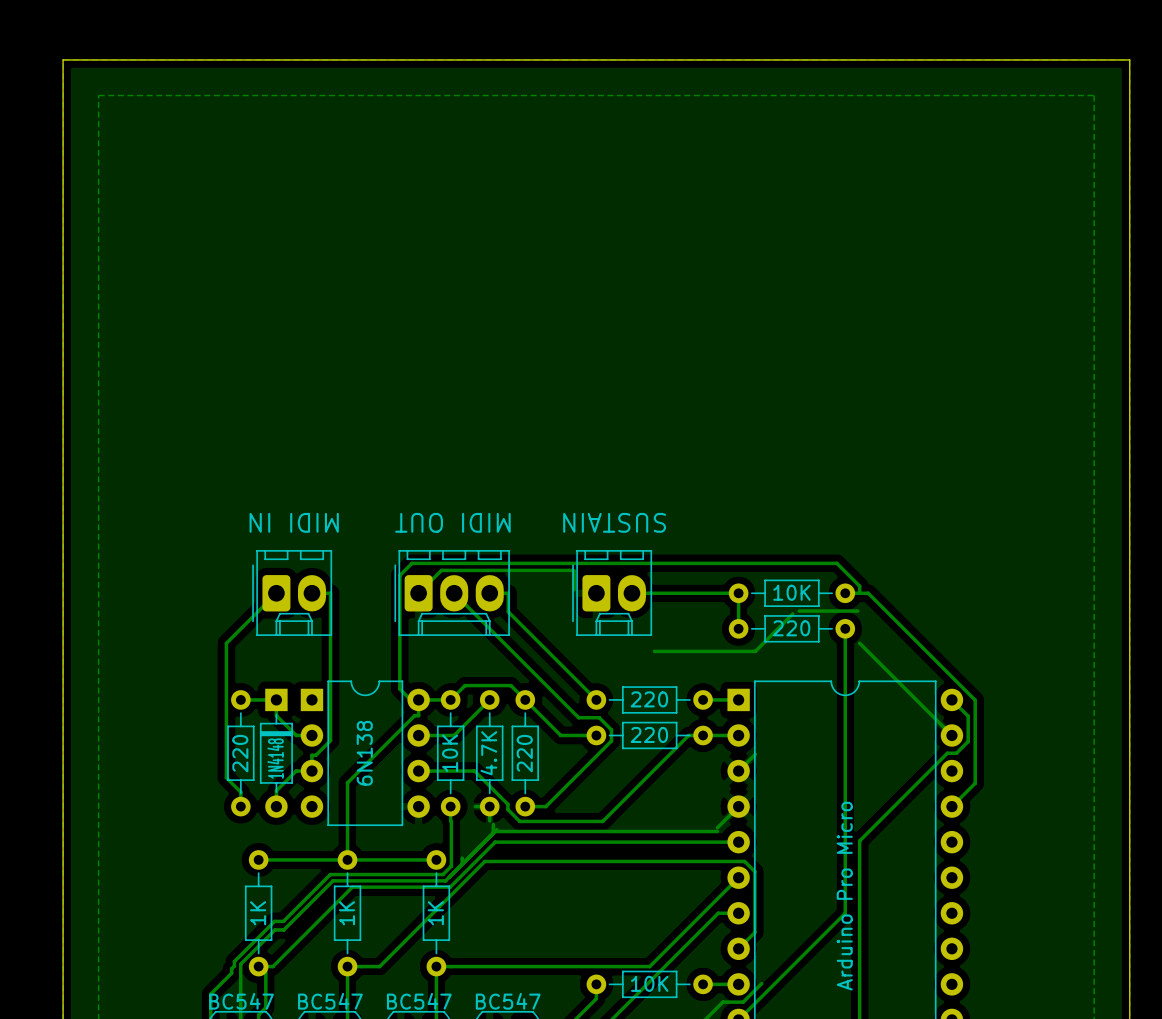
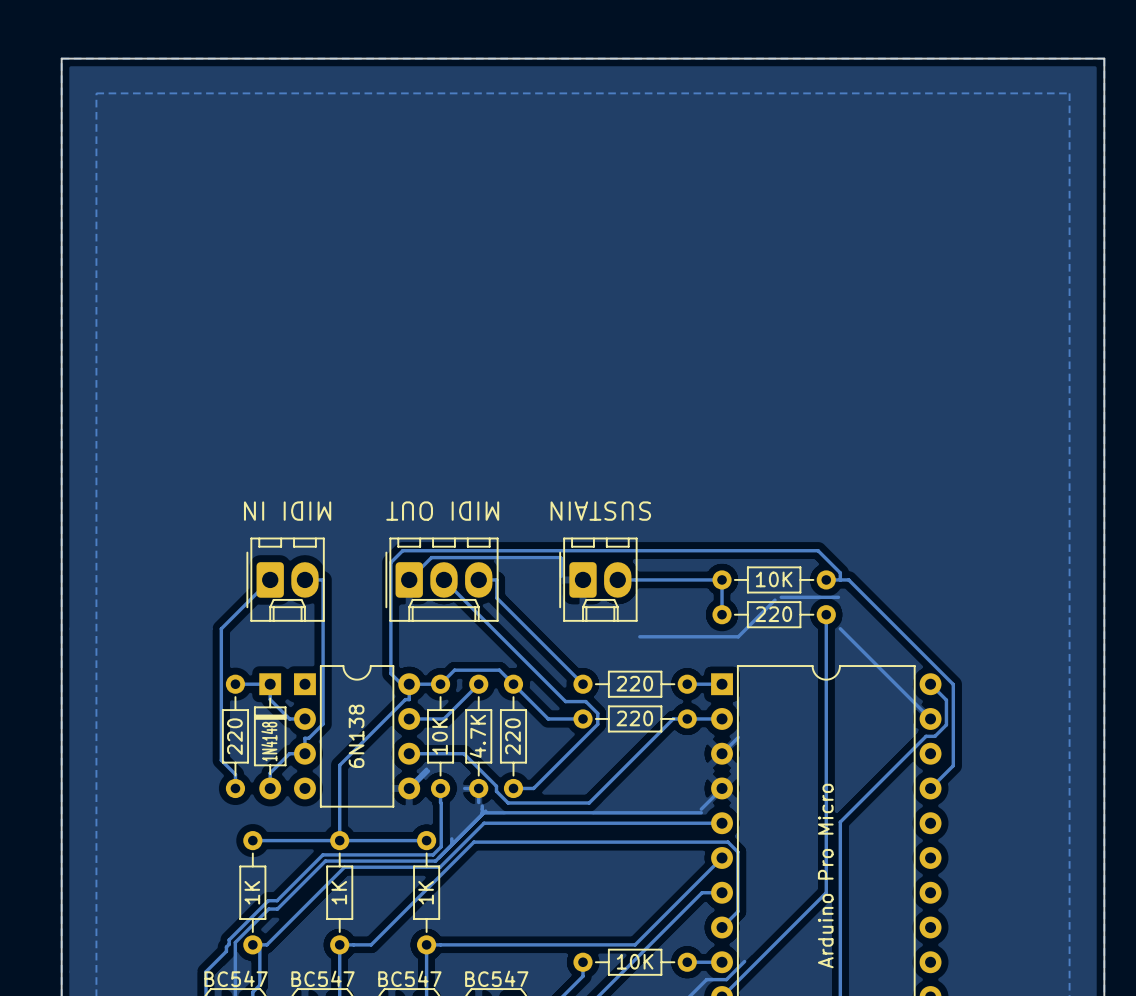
bottom track: none -> (426, 769) (414, 781)
bottom track: none -> (428, 771) (416, 783)

